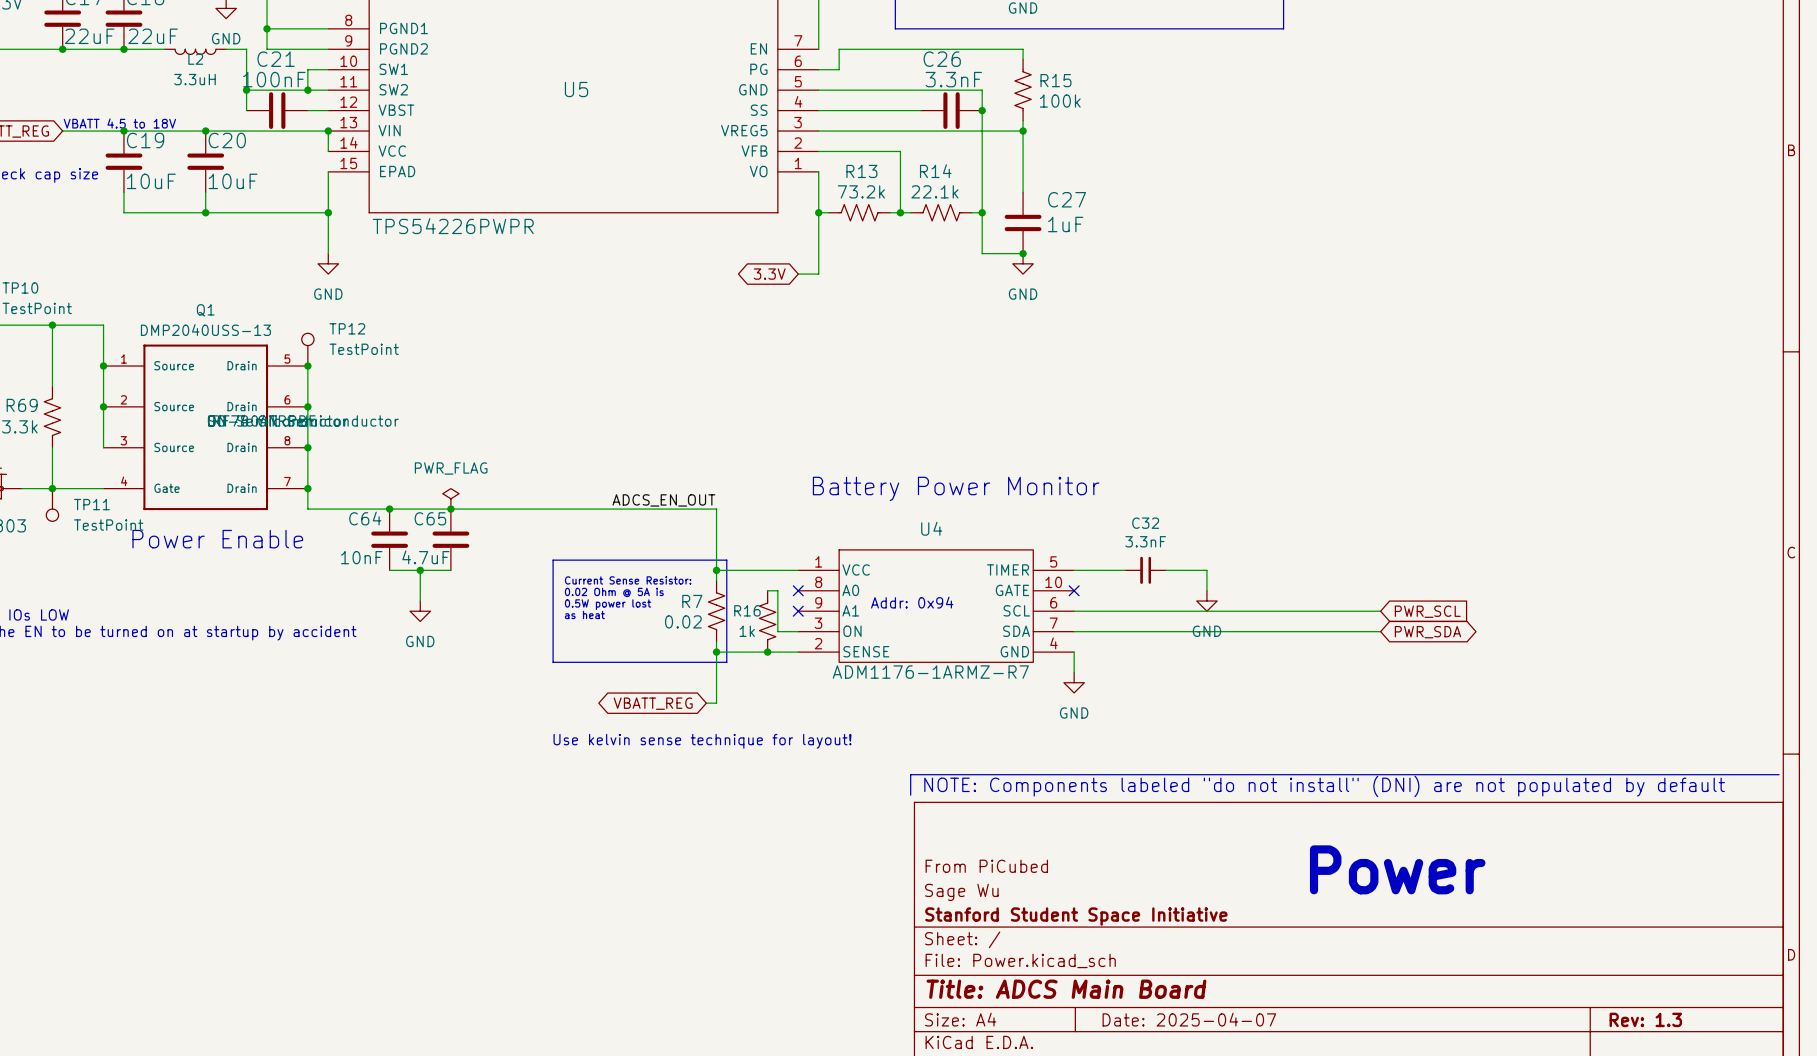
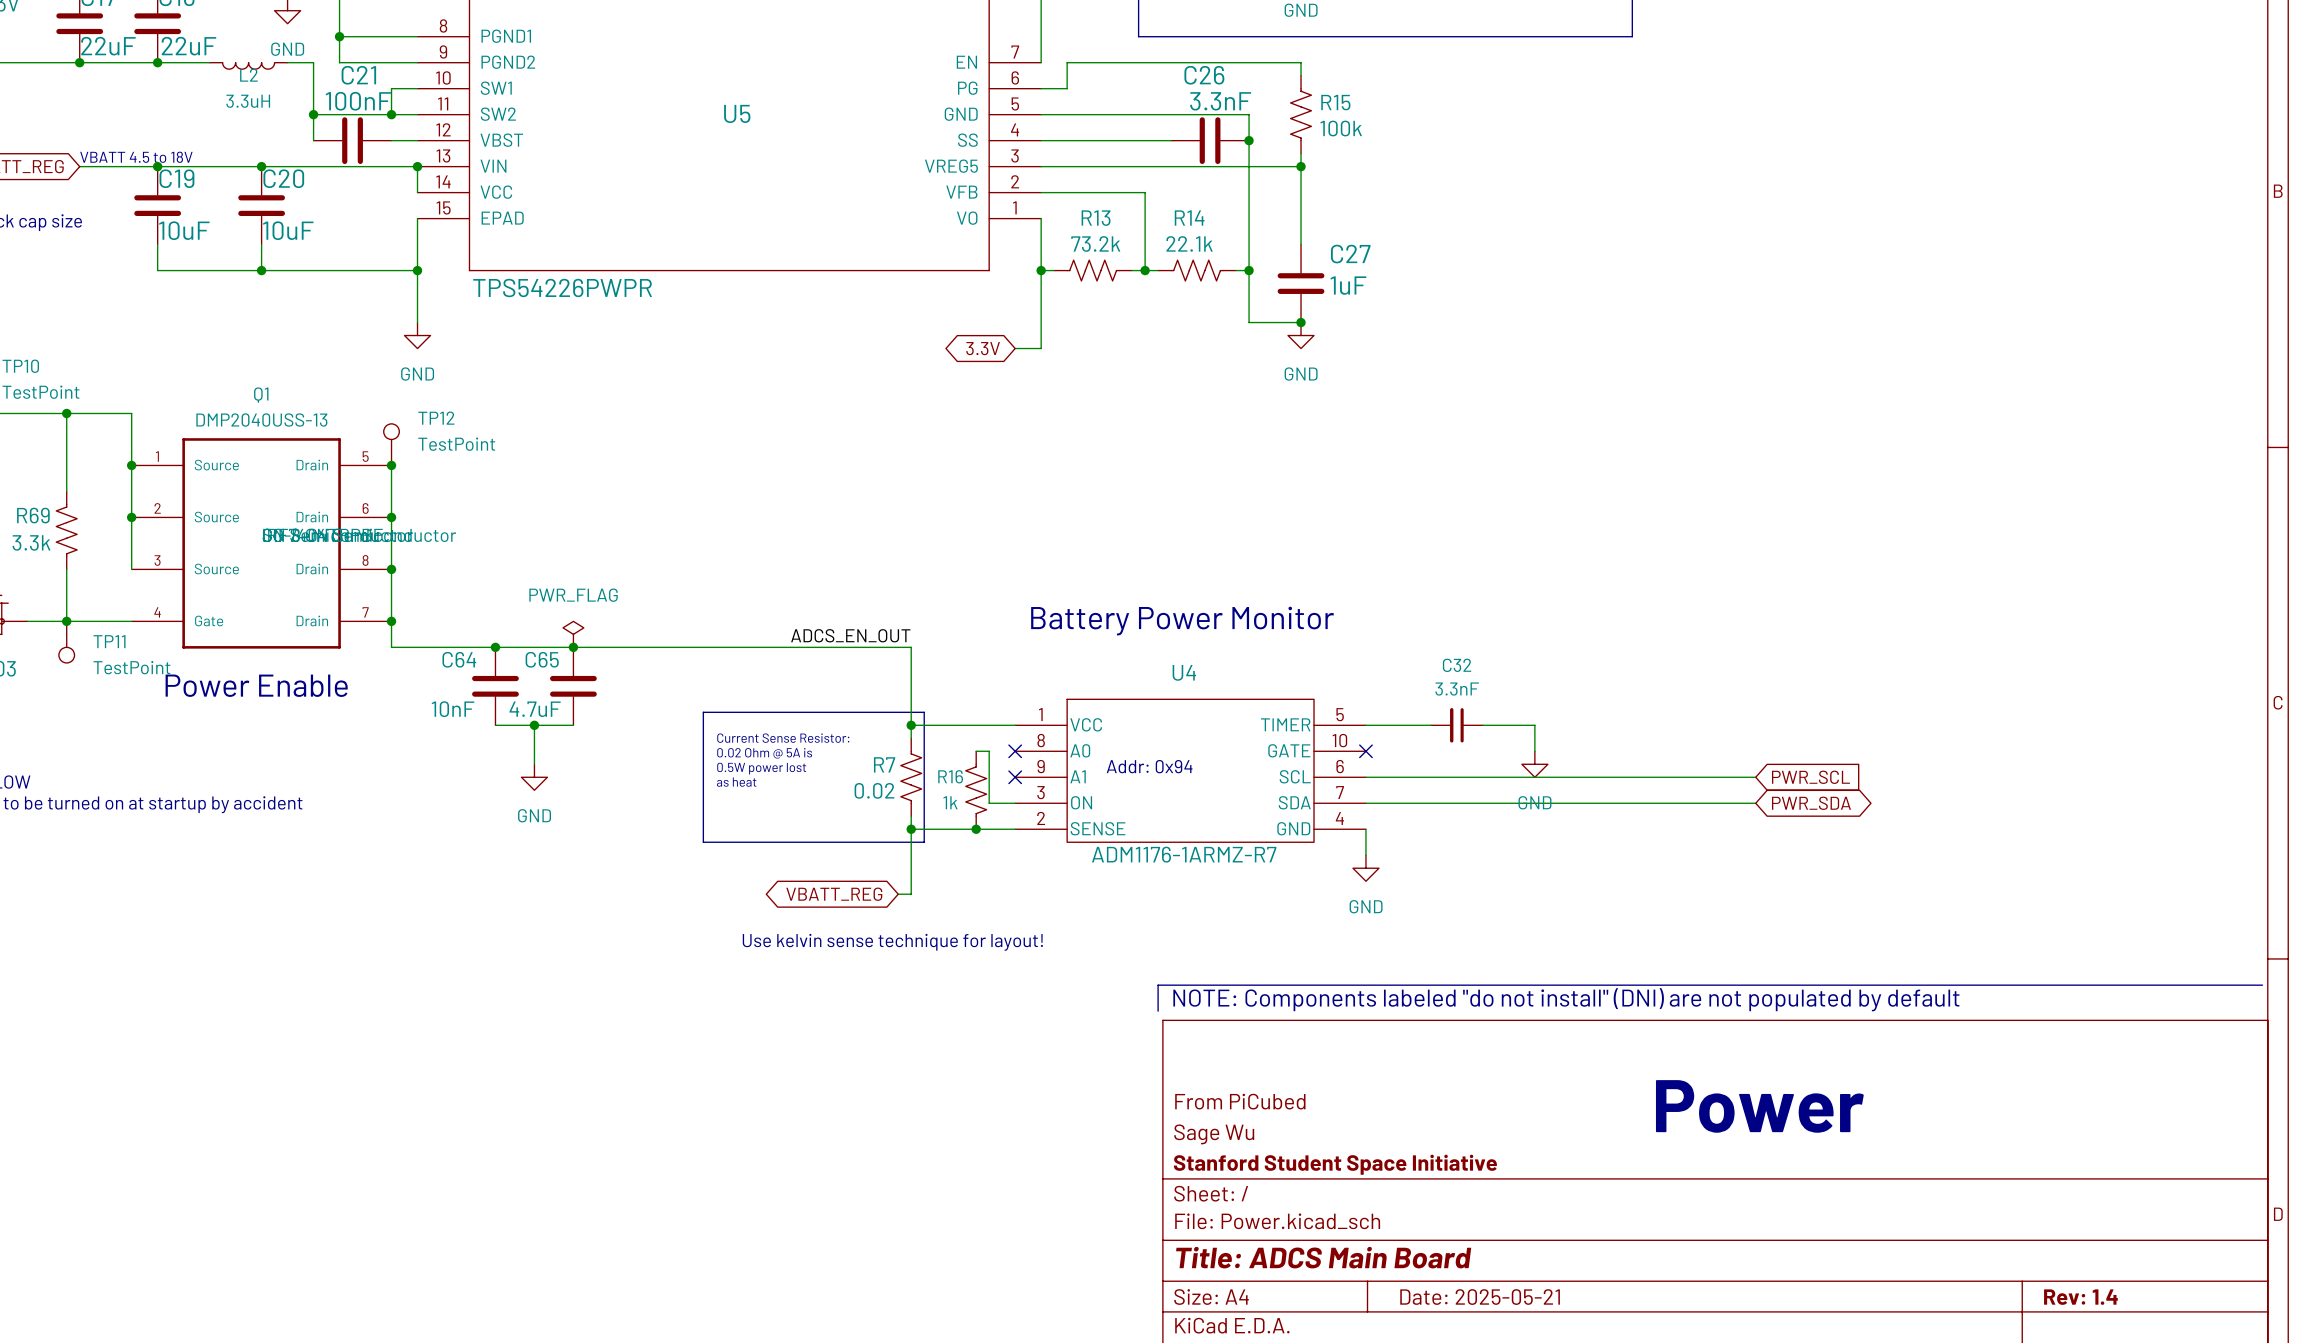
title block: Date: 2025-04-07 (1189, 1019) -> Date: 2025-05-21 (1480, 1297)
title block: Rev: 1.3 (1645, 1019) -> Rev: 1.4 (2080, 1297)

